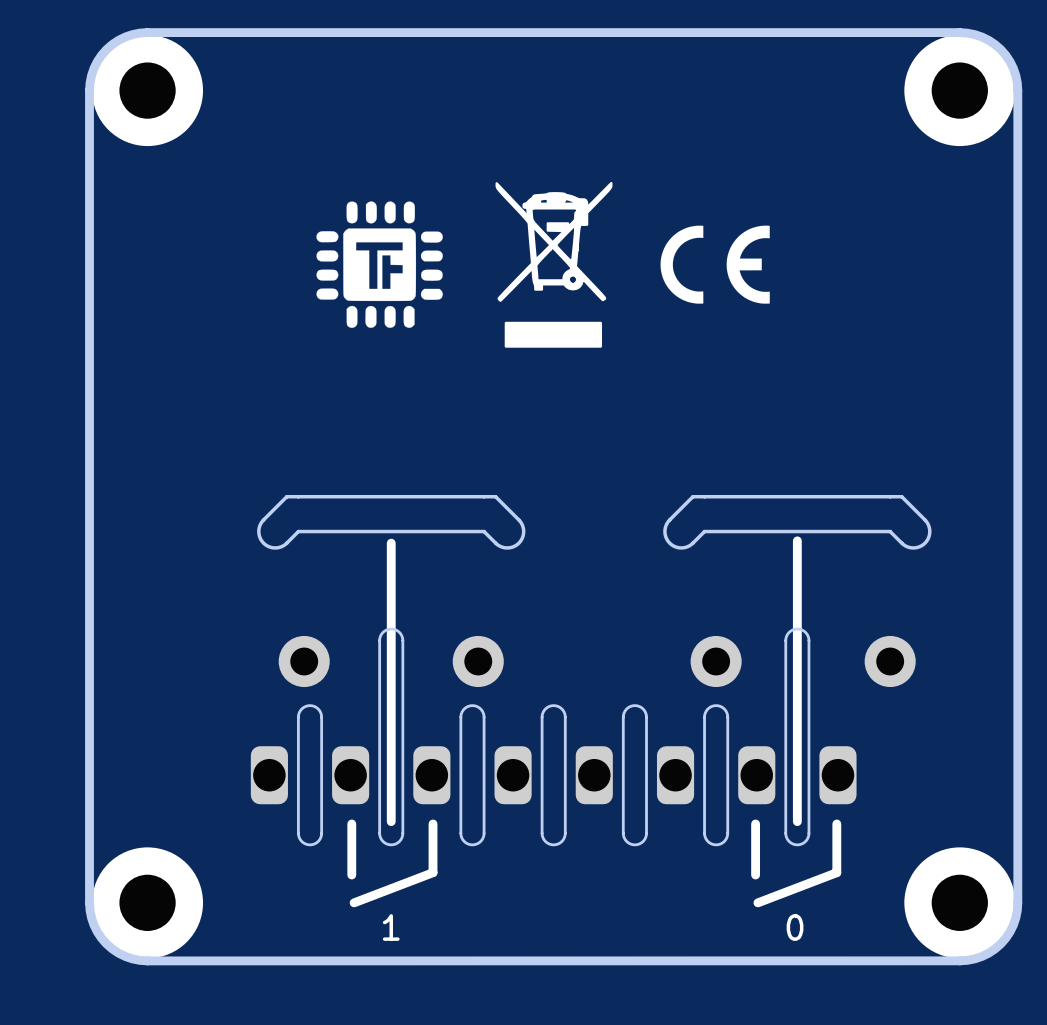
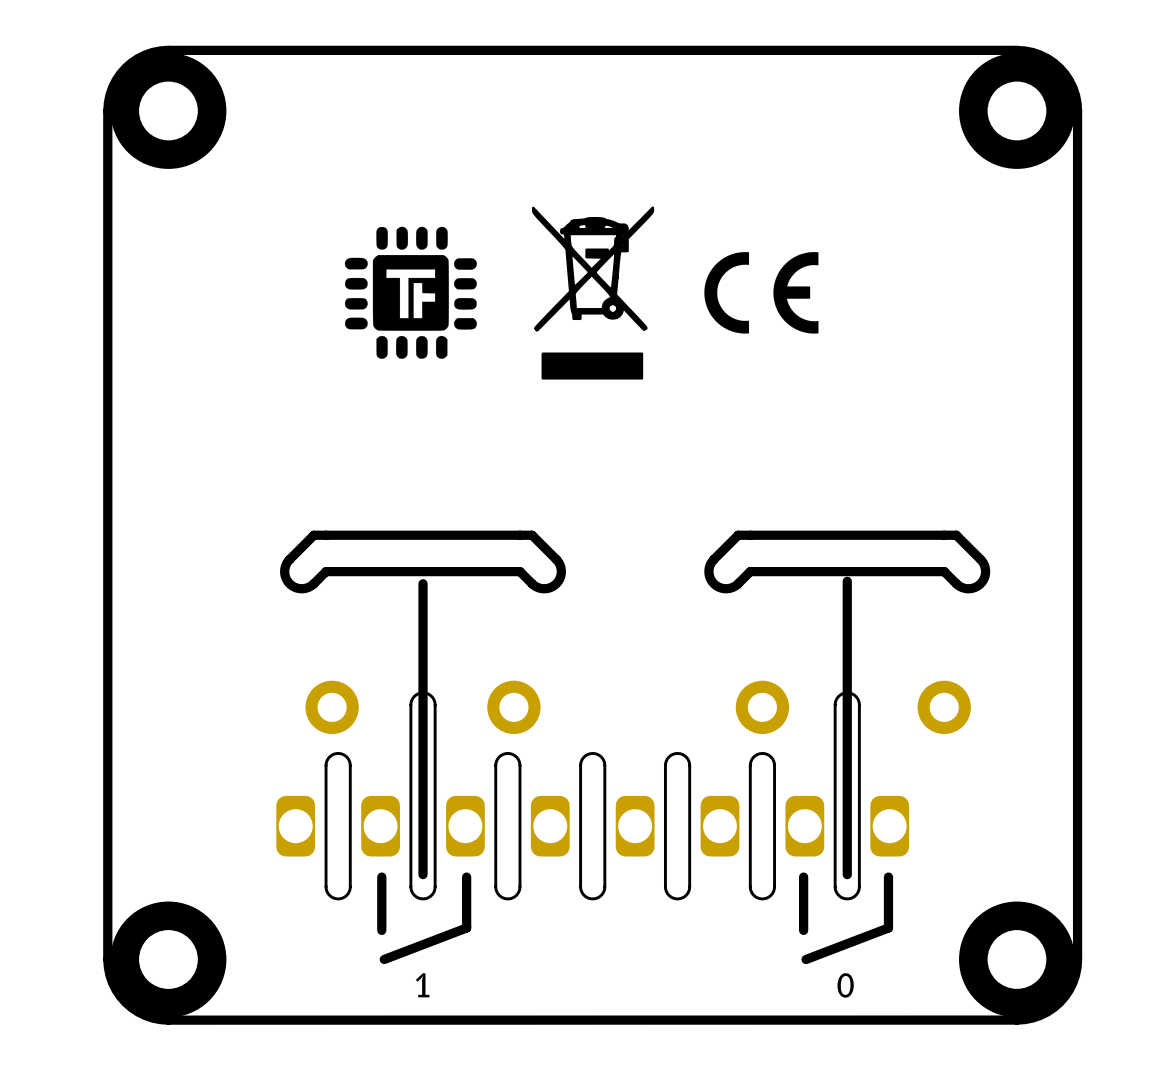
board edge width: thin (495, 496) (286, 496) (262, 521) (258, 533) (265, 544) (275, 547) (285, 544) (298, 531) (484, 531) (498, 545) (512, 547) (521, 540) (522, 526) (518, 519) (495, 496) -> thick (532, 535) (313, 535) (288, 561) (284, 573) (291, 585) (301, 588) (312, 585) (326, 571) (519, 571) (535, 586) (549, 587) (558, 580) (560, 566) (556, 559) (532, 535)
board edge width: thin (901, 496) (692, 496) (668, 521) (665, 533) (669, 543) (681, 547) (691, 544) (704, 531) (890, 531) (905, 545) (917, 547) (927, 539) (929, 527) (924, 519) (901, 496) -> thick (956, 535) (738, 535) (712, 561) (709, 573) (713, 583) (726, 588) (736, 585) (750, 571) (944, 571) (959, 586) (972, 588) (983, 580) (985, 567) (980, 559) (956, 535)
part footprint: [250, 627, 857, 847] -> [276, 691, 910, 901]

